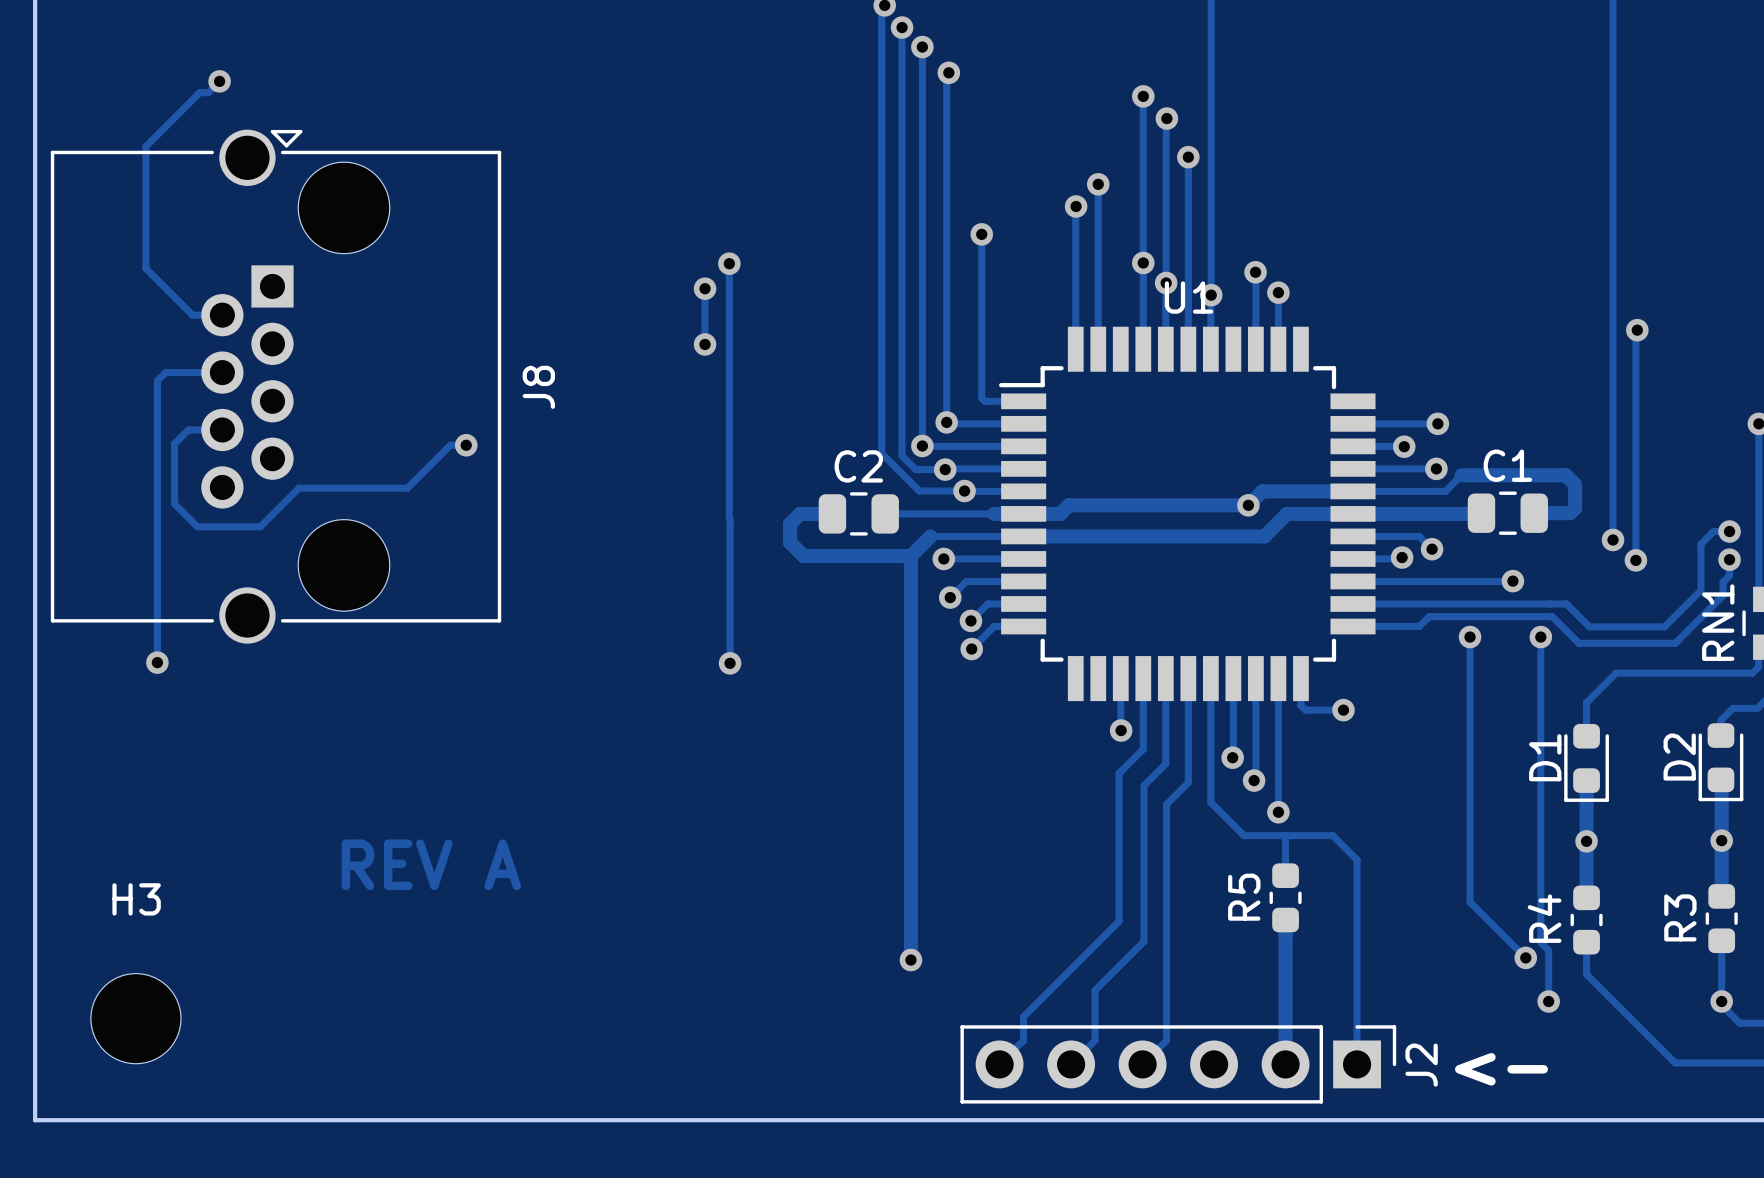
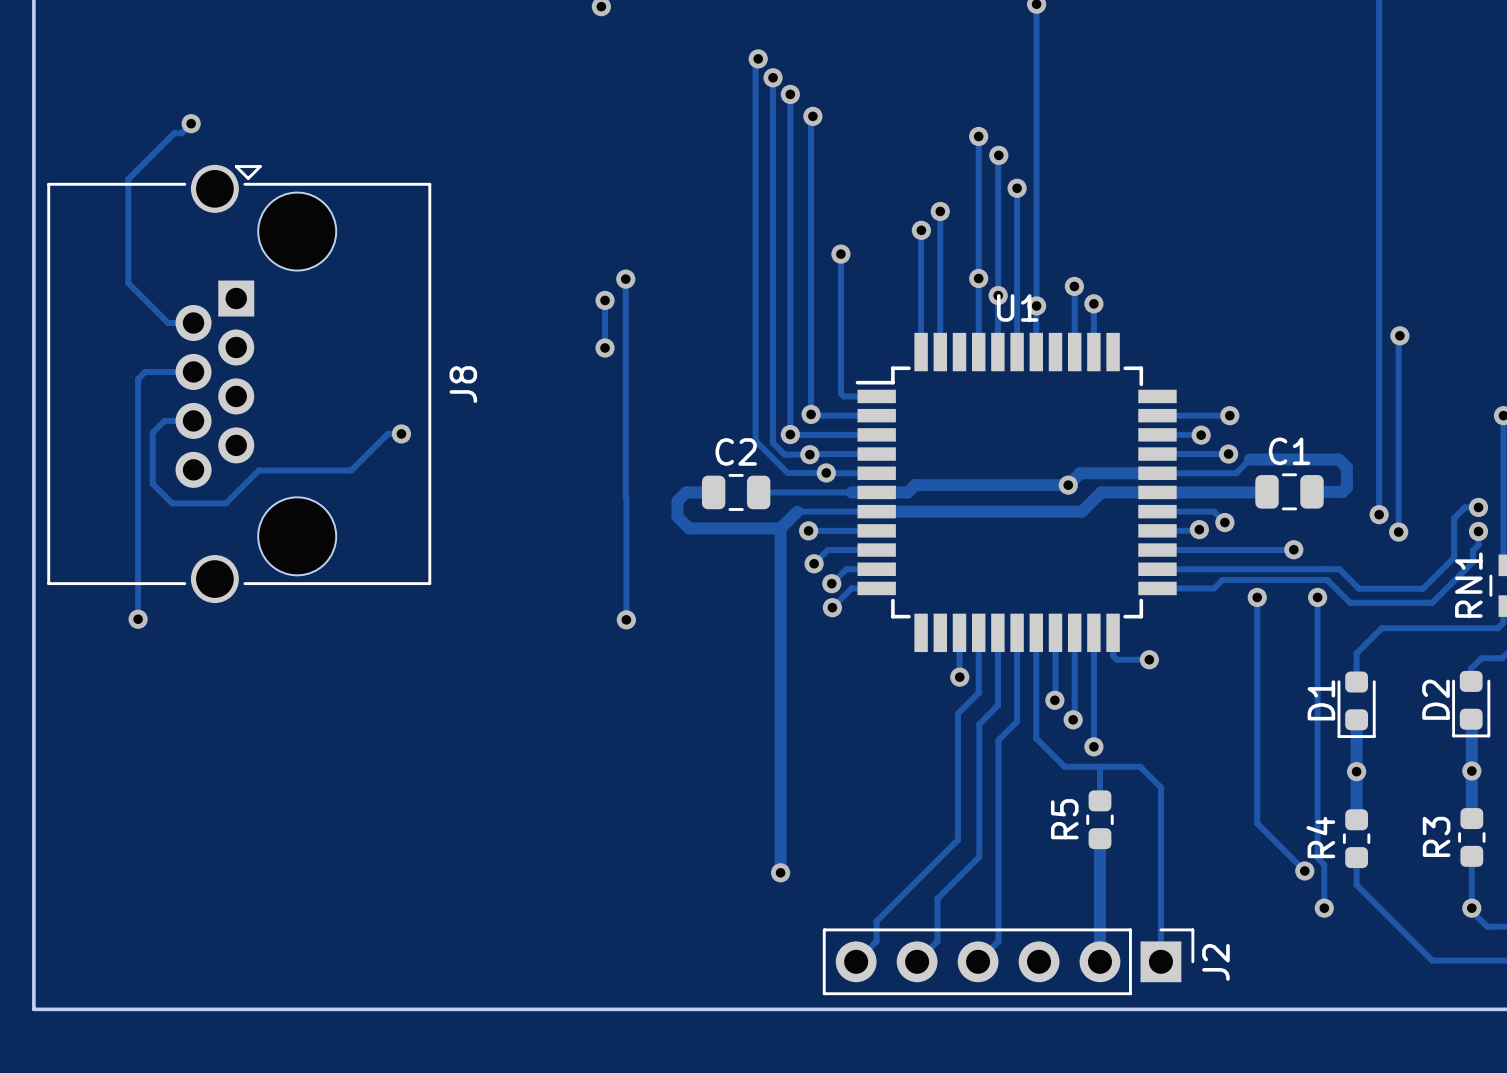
text: REV A (431, 864) -> none
H3: (135, 1018) -> none
text: <- (1501, 1069) -> none

